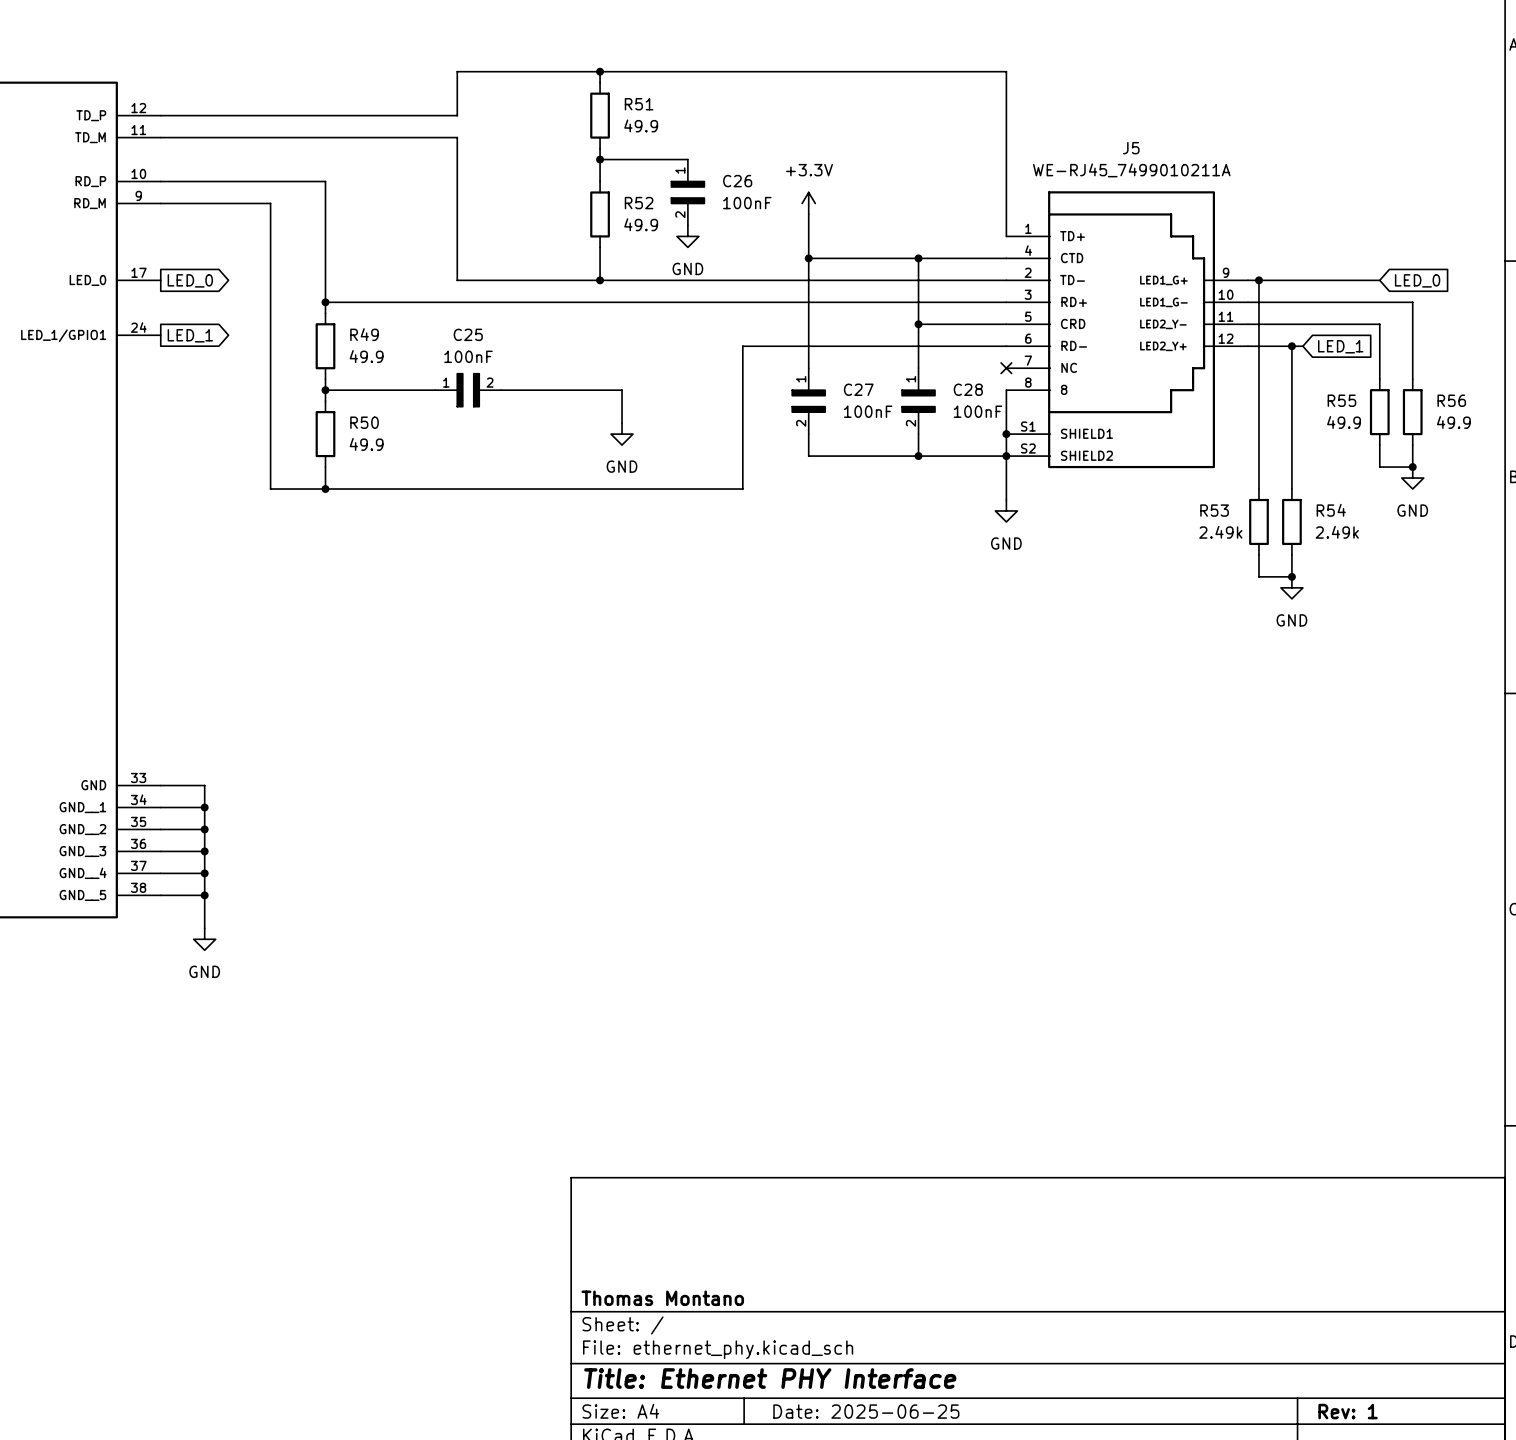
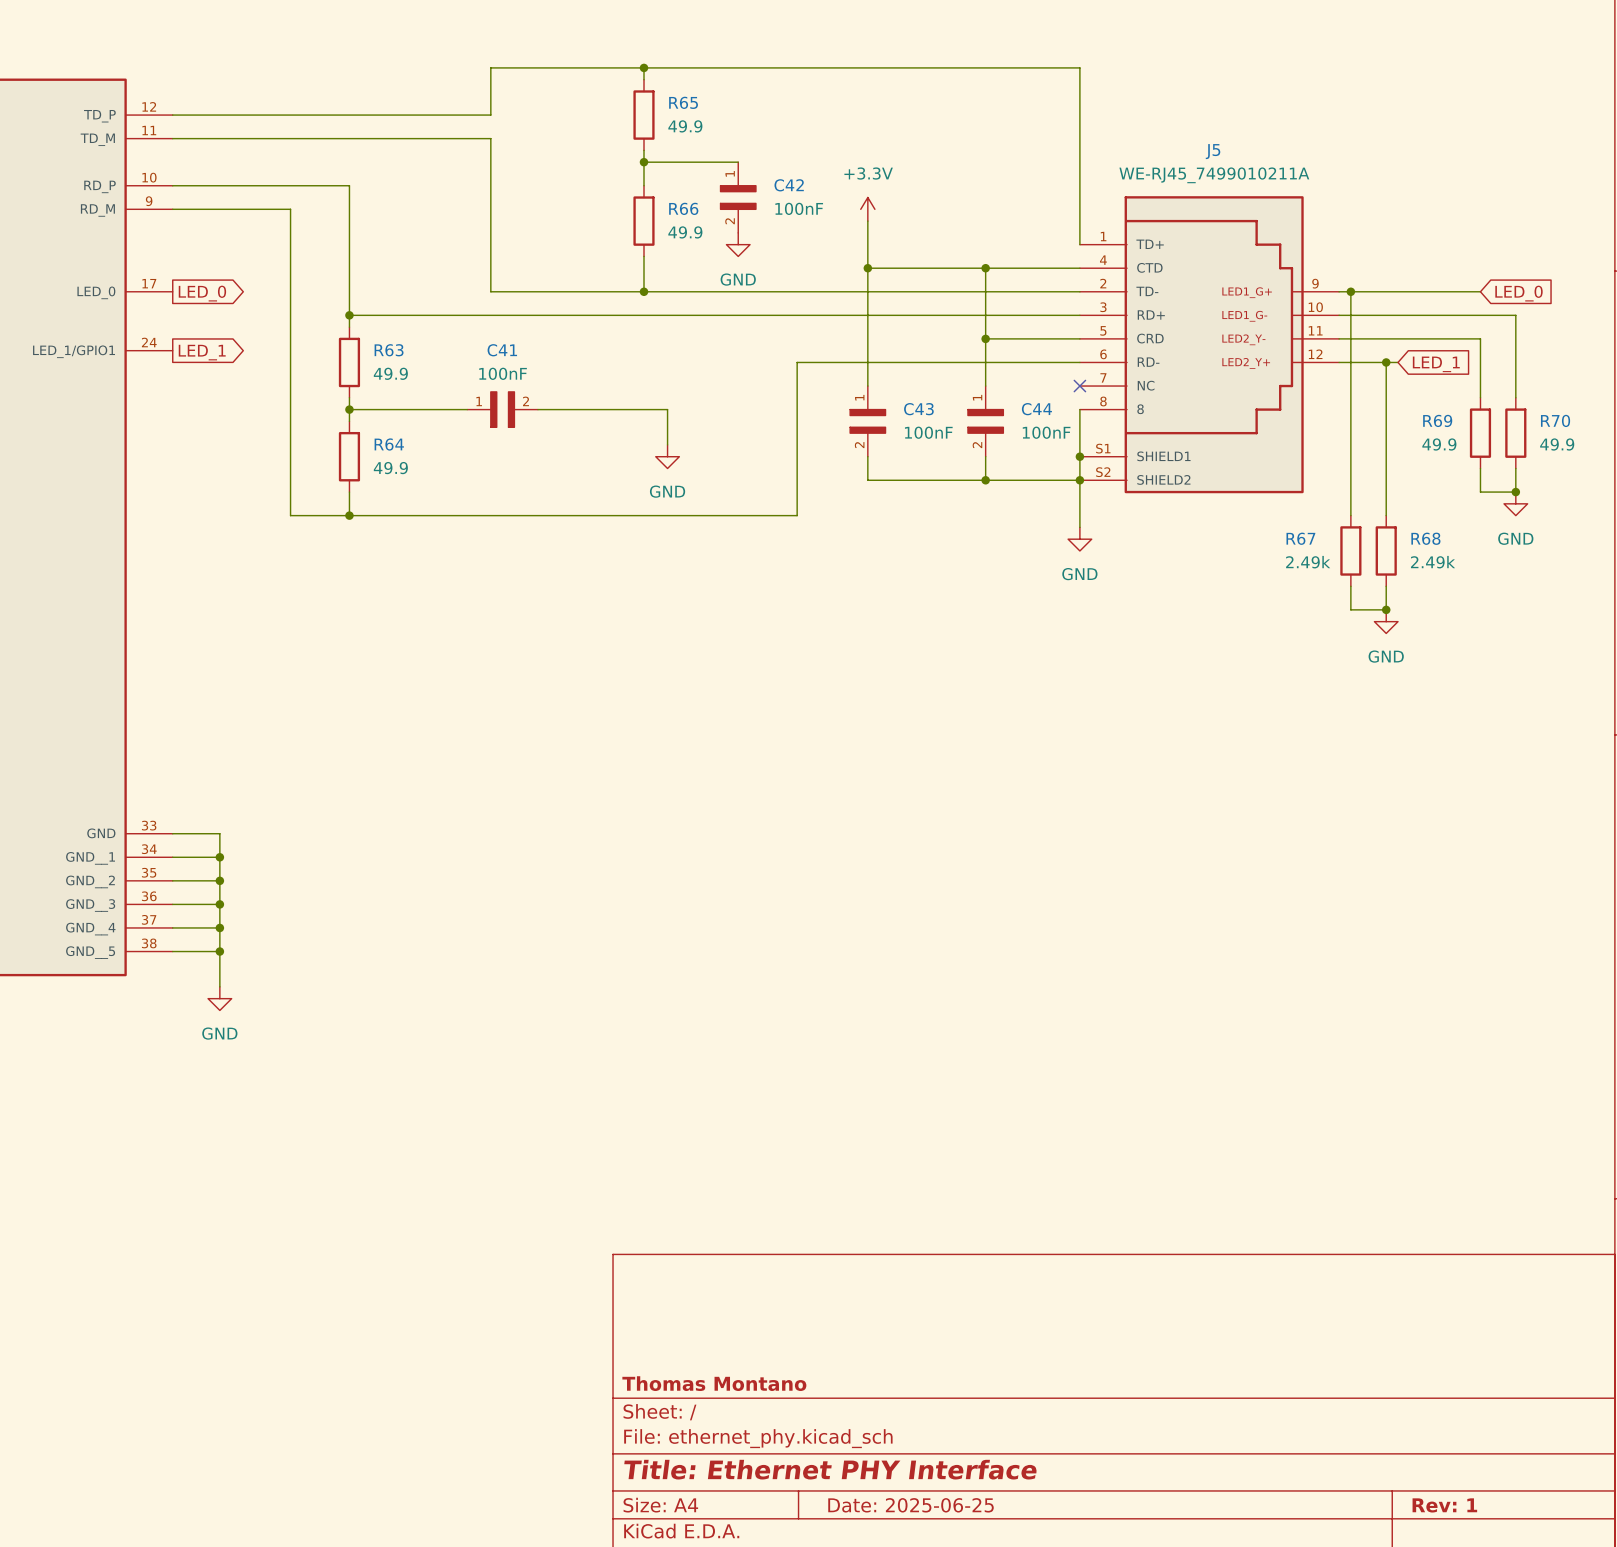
R51 name: R51 (639, 104) -> R65 (683, 102)
C26 name: C26 (737, 181) -> C42 (789, 185)
R52 name: R52 (639, 203) -> R66 (683, 208)
R49 name: R49 (364, 334) -> R63 (389, 350)
C25 name: C25 (468, 334) -> C41 (502, 350)
C27 name: C27 (858, 389) -> C43 (918, 409)
C28 name: C28 (968, 389) -> C44 (1036, 409)
R55 name: R55 (1341, 400) -> R69 (1437, 420)
R56 name: R56 (1451, 400) -> R70 (1555, 420)
R50 name: R50 (364, 422) -> R64 (389, 444)
R53 name: R53 (1214, 510) -> R67 (1300, 538)
R54 name: R54 (1331, 510) -> R68 (1425, 538)

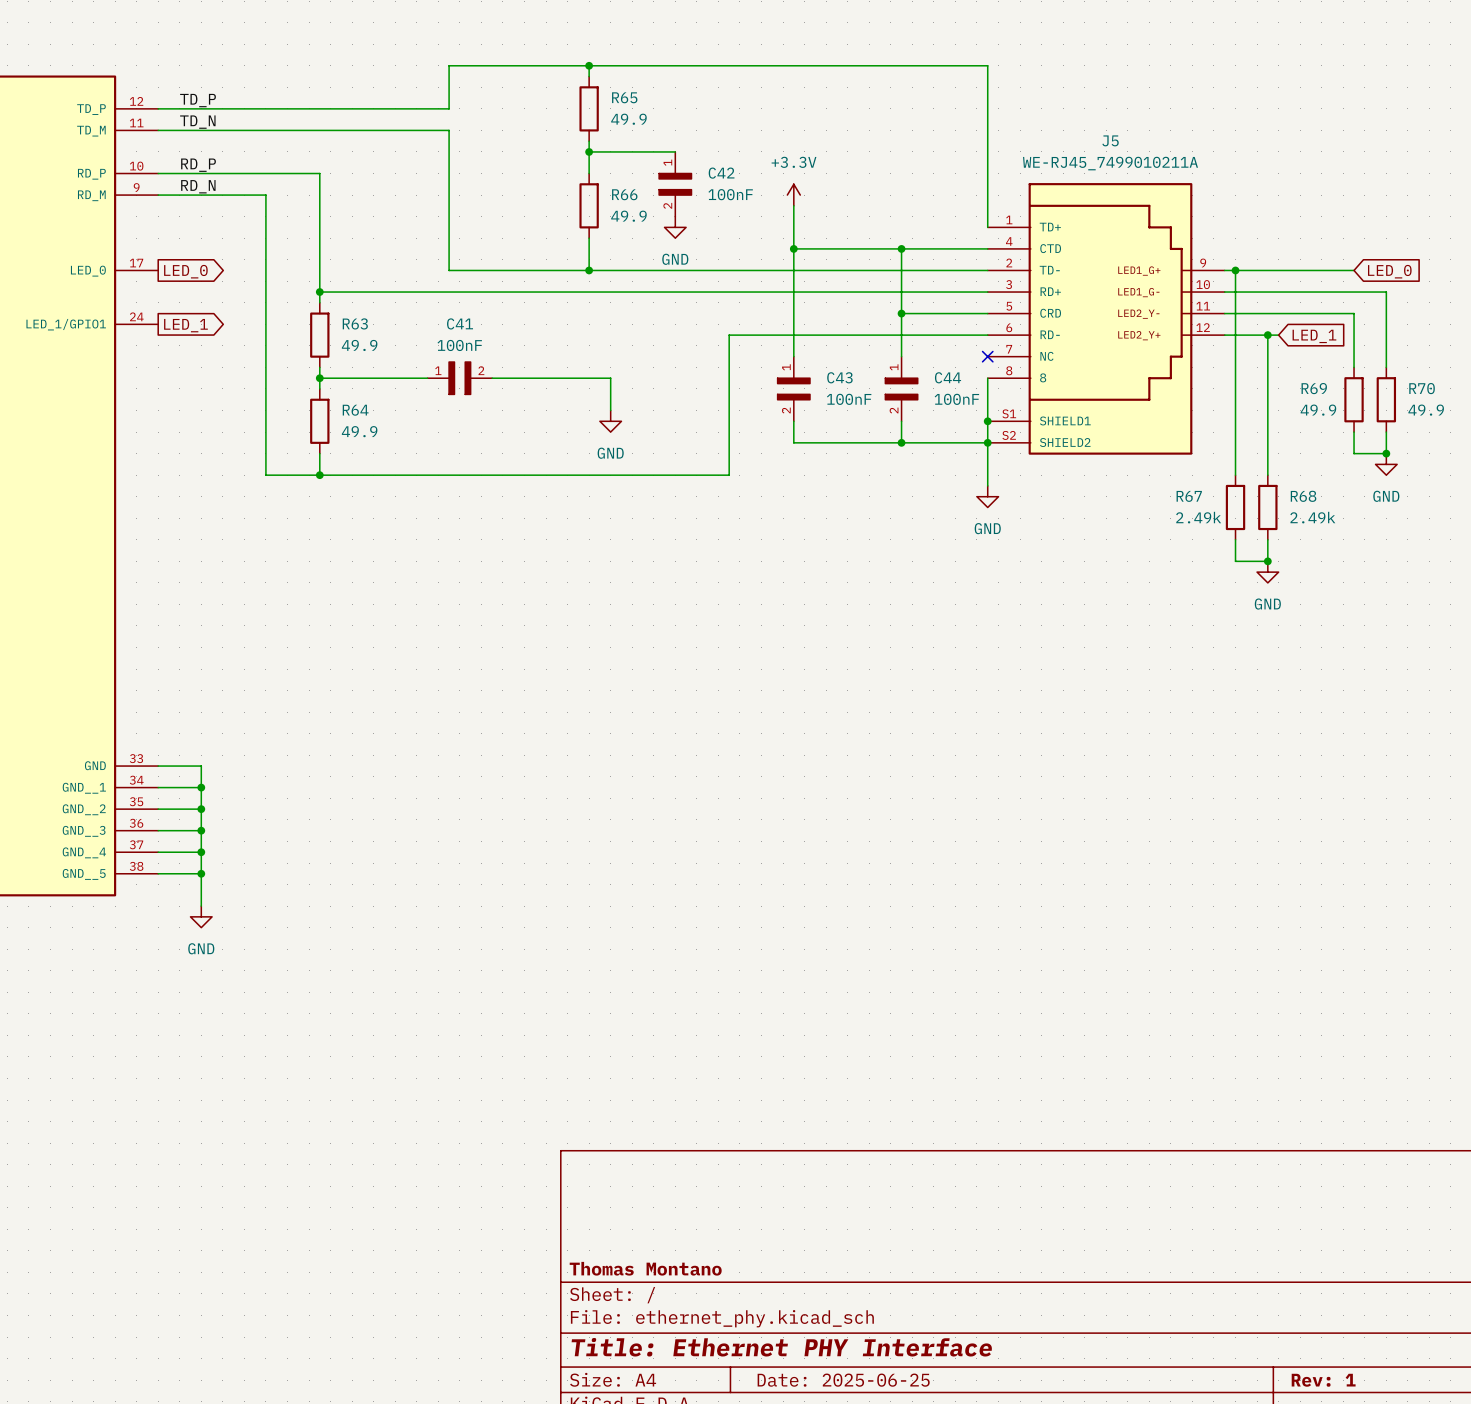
label: none -> TD_P (198, 100)
label: none -> TD_N (197, 122)
label: none -> RD_P (198, 165)
label: none -> RD_N (198, 186)

